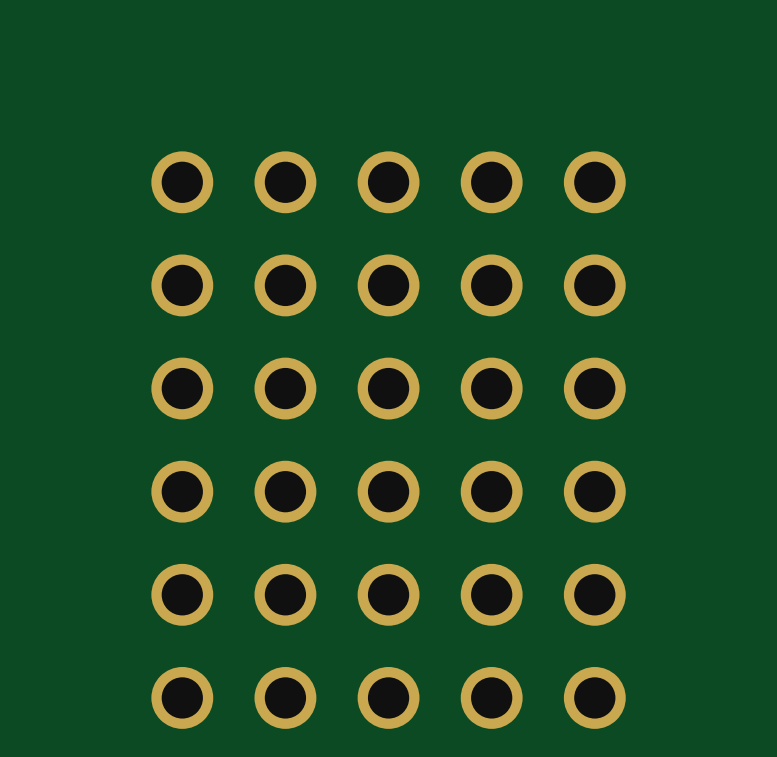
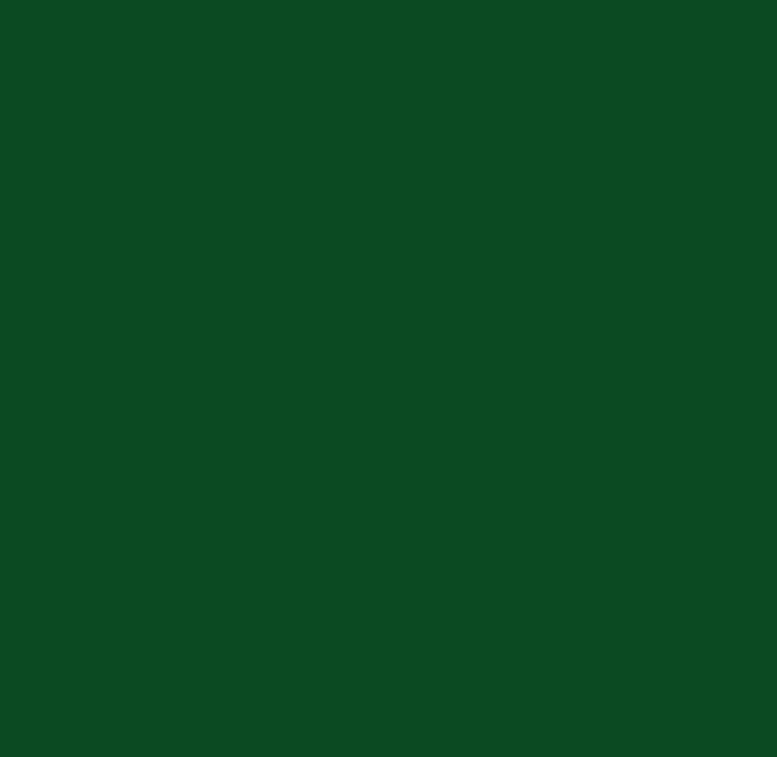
via: (182, 182) -> none
via: (285, 182) -> none
via: (388, 182) -> none
via: (491, 182) -> none
via: (594, 182) -> none
via: (182, 285) -> none
via: (285, 285) -> none
via: (388, 285) -> none
via: (491, 285) -> none
via: (594, 285) -> none
via: (182, 388) -> none
via: (285, 388) -> none
via: (388, 388) -> none
via: (491, 388) -> none
via: (594, 388) -> none
via: (182, 491) -> none
via: (285, 491) -> none
via: (388, 491) -> none
via: (491, 491) -> none
via: (594, 491) -> none
via: (182, 594) -> none
via: (285, 594) -> none
via: (388, 594) -> none
via: (491, 594) -> none
via: (594, 594) -> none
via: (182, 697) -> none
via: (285, 697) -> none
via: (388, 697) -> none
via: (491, 697) -> none
via: (594, 697) -> none

